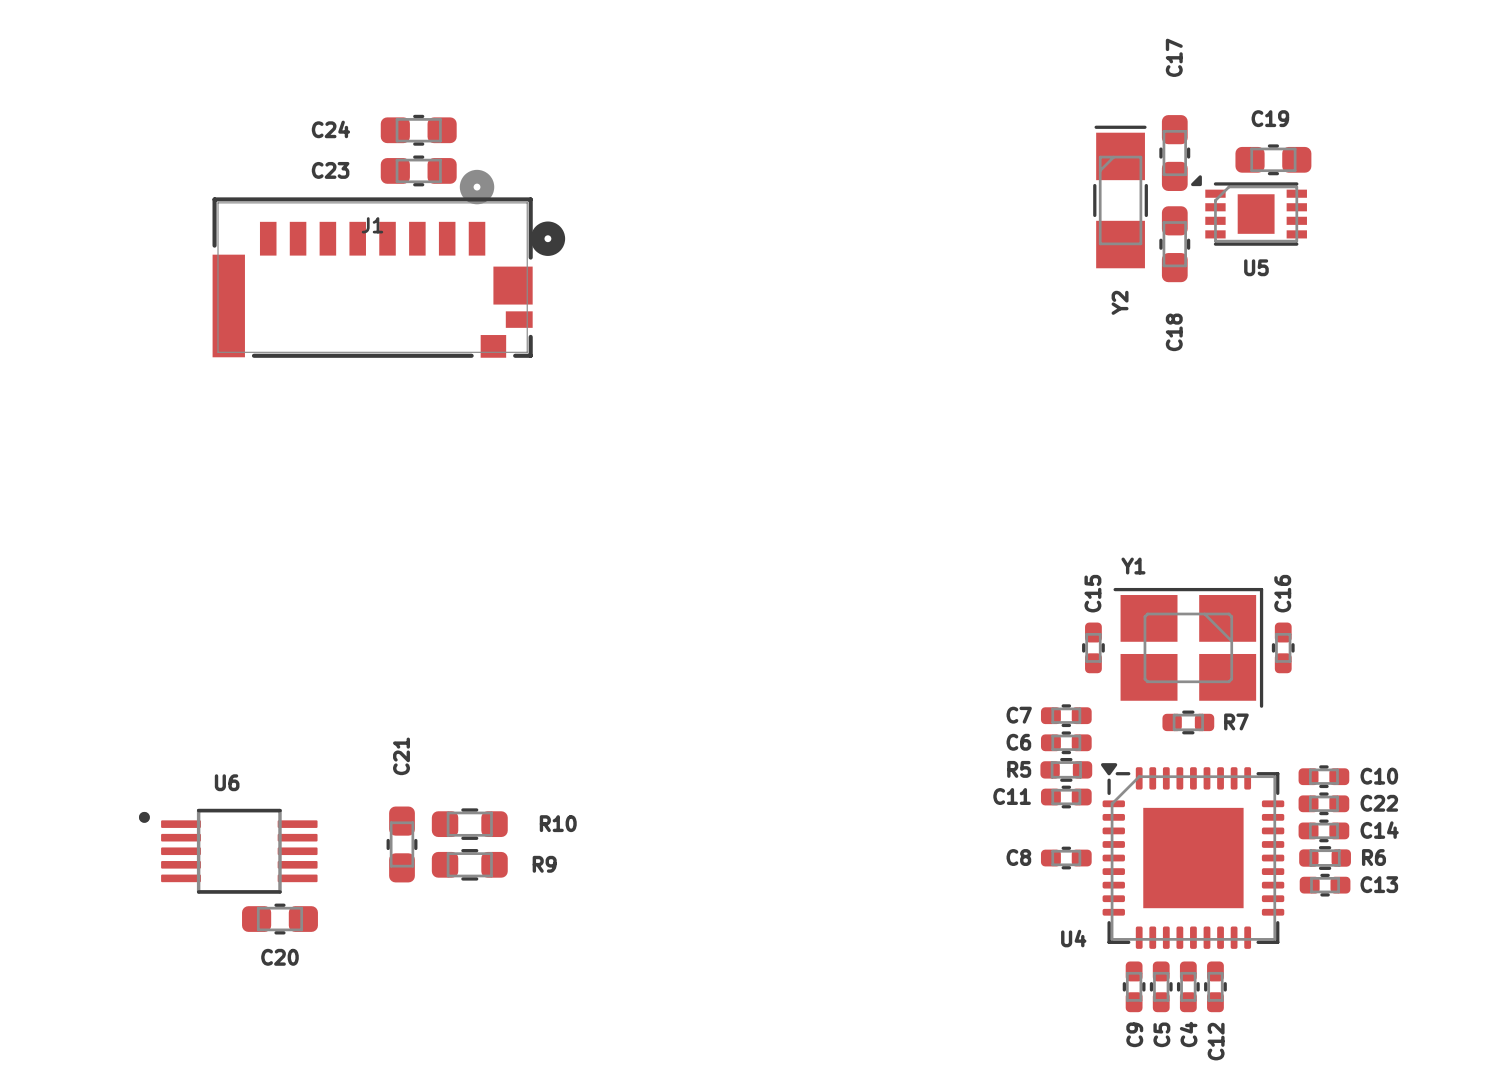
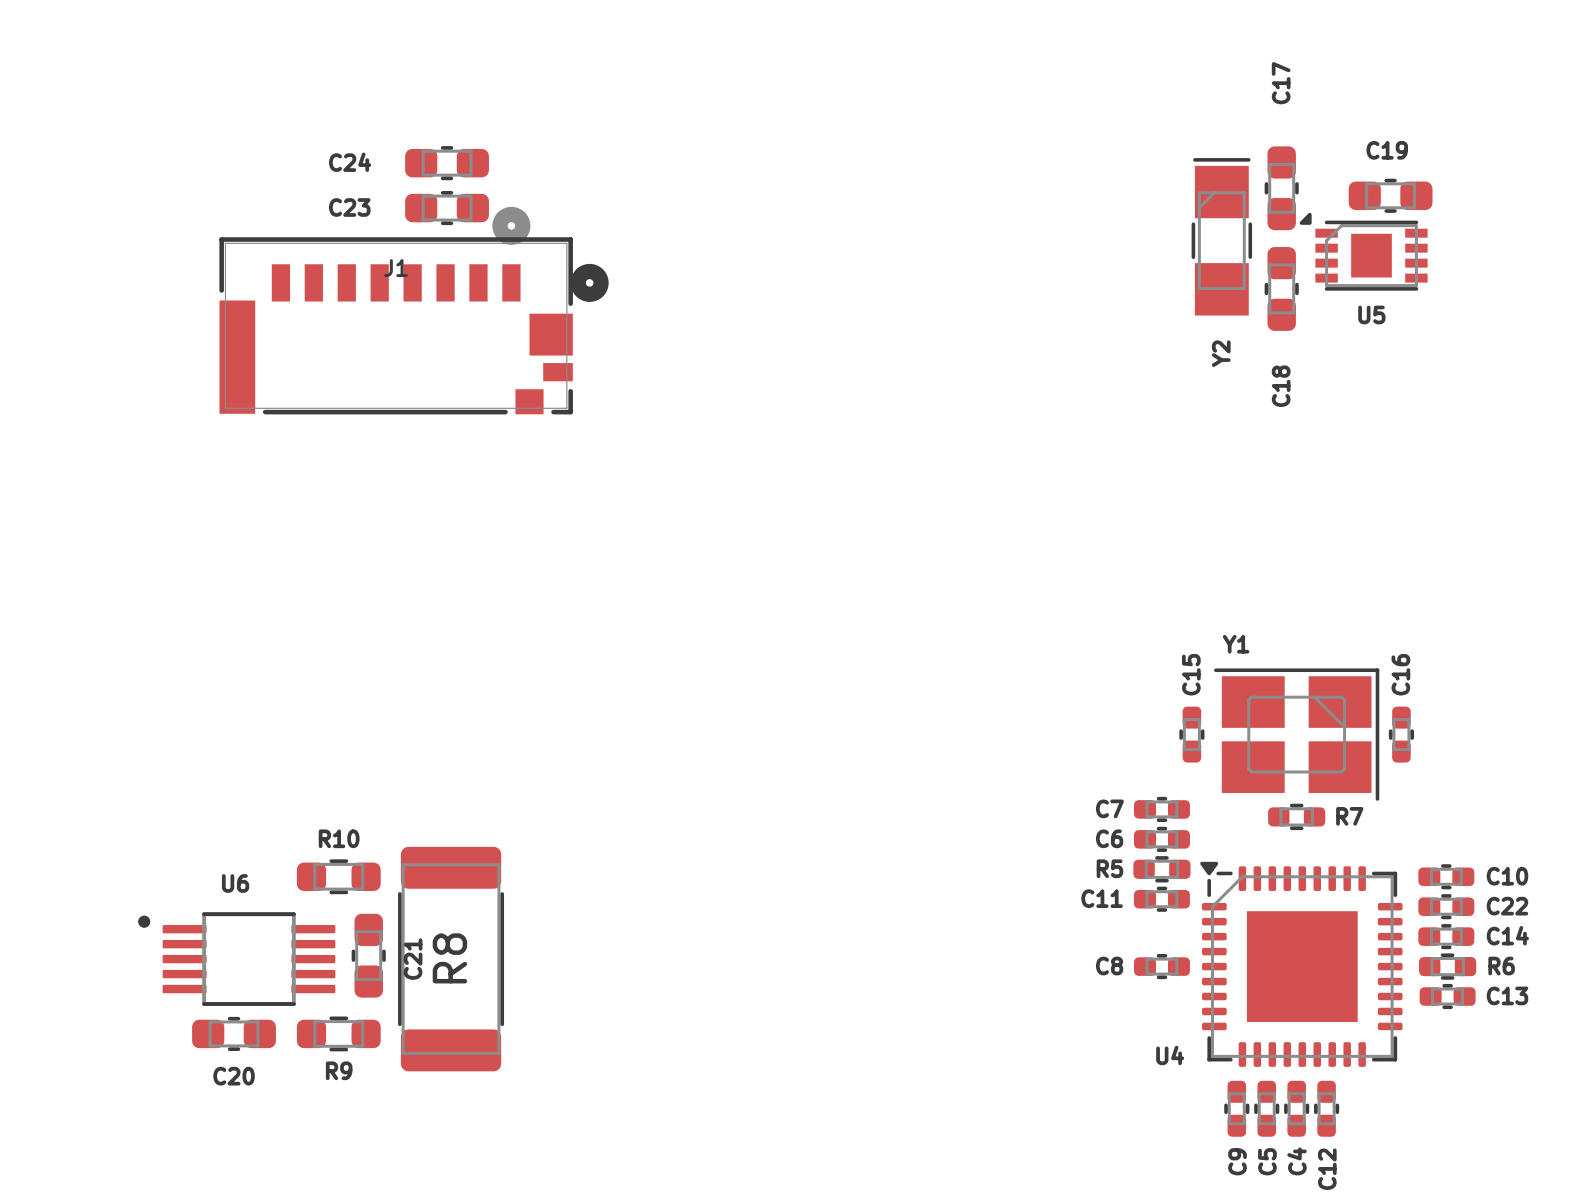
C21 name position: C21 (401, 756) -> C21 (413, 959)
R10 name position: R10 (558, 823) -> R10 (339, 838)
R10 position: (469, 824) -> (338, 876)
C21 position: (402, 844) -> (368, 955)
R8: none -> (451, 959)
R9 position: (469, 864) -> (338, 1033)
R9 name position: R9 (544, 864) -> R9 (339, 1070)
C20 position: (279, 919) -> (234, 1033)

